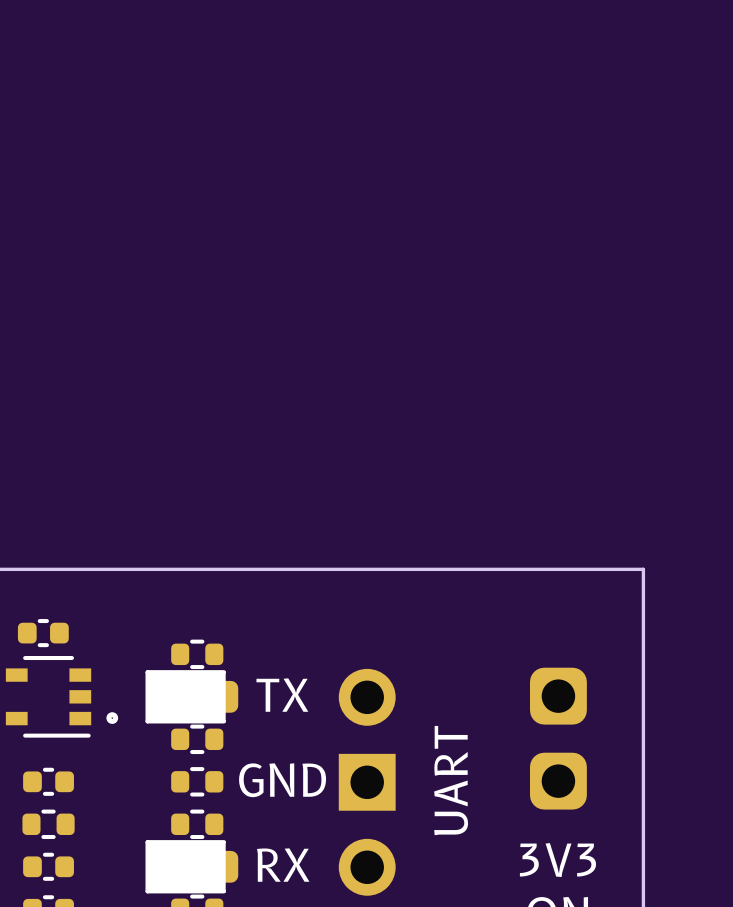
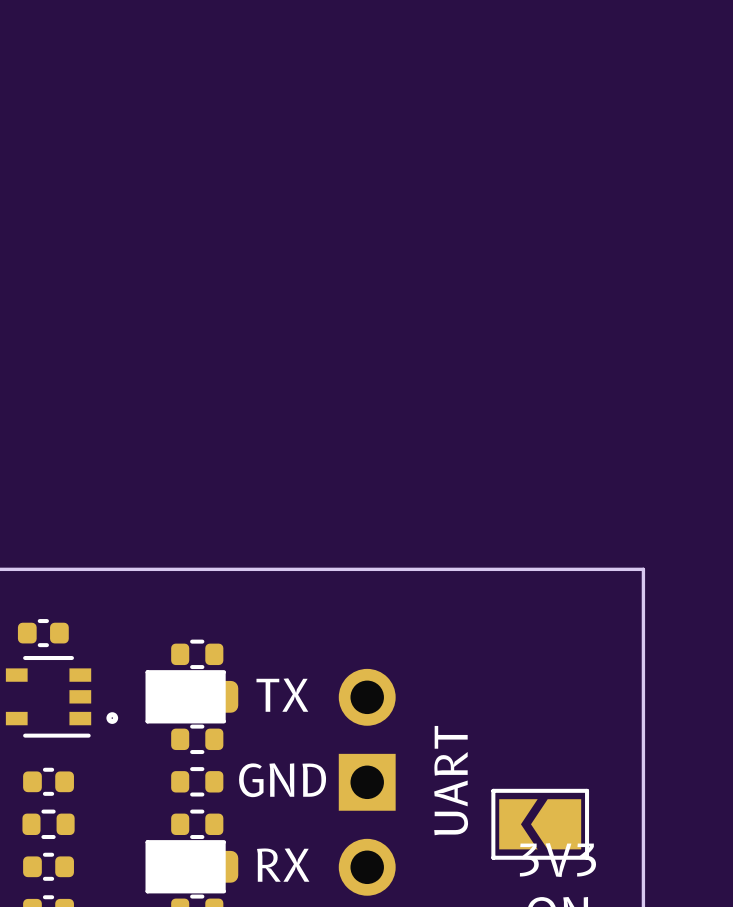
part: (558, 738) -> none
part: none -> (540, 824)

